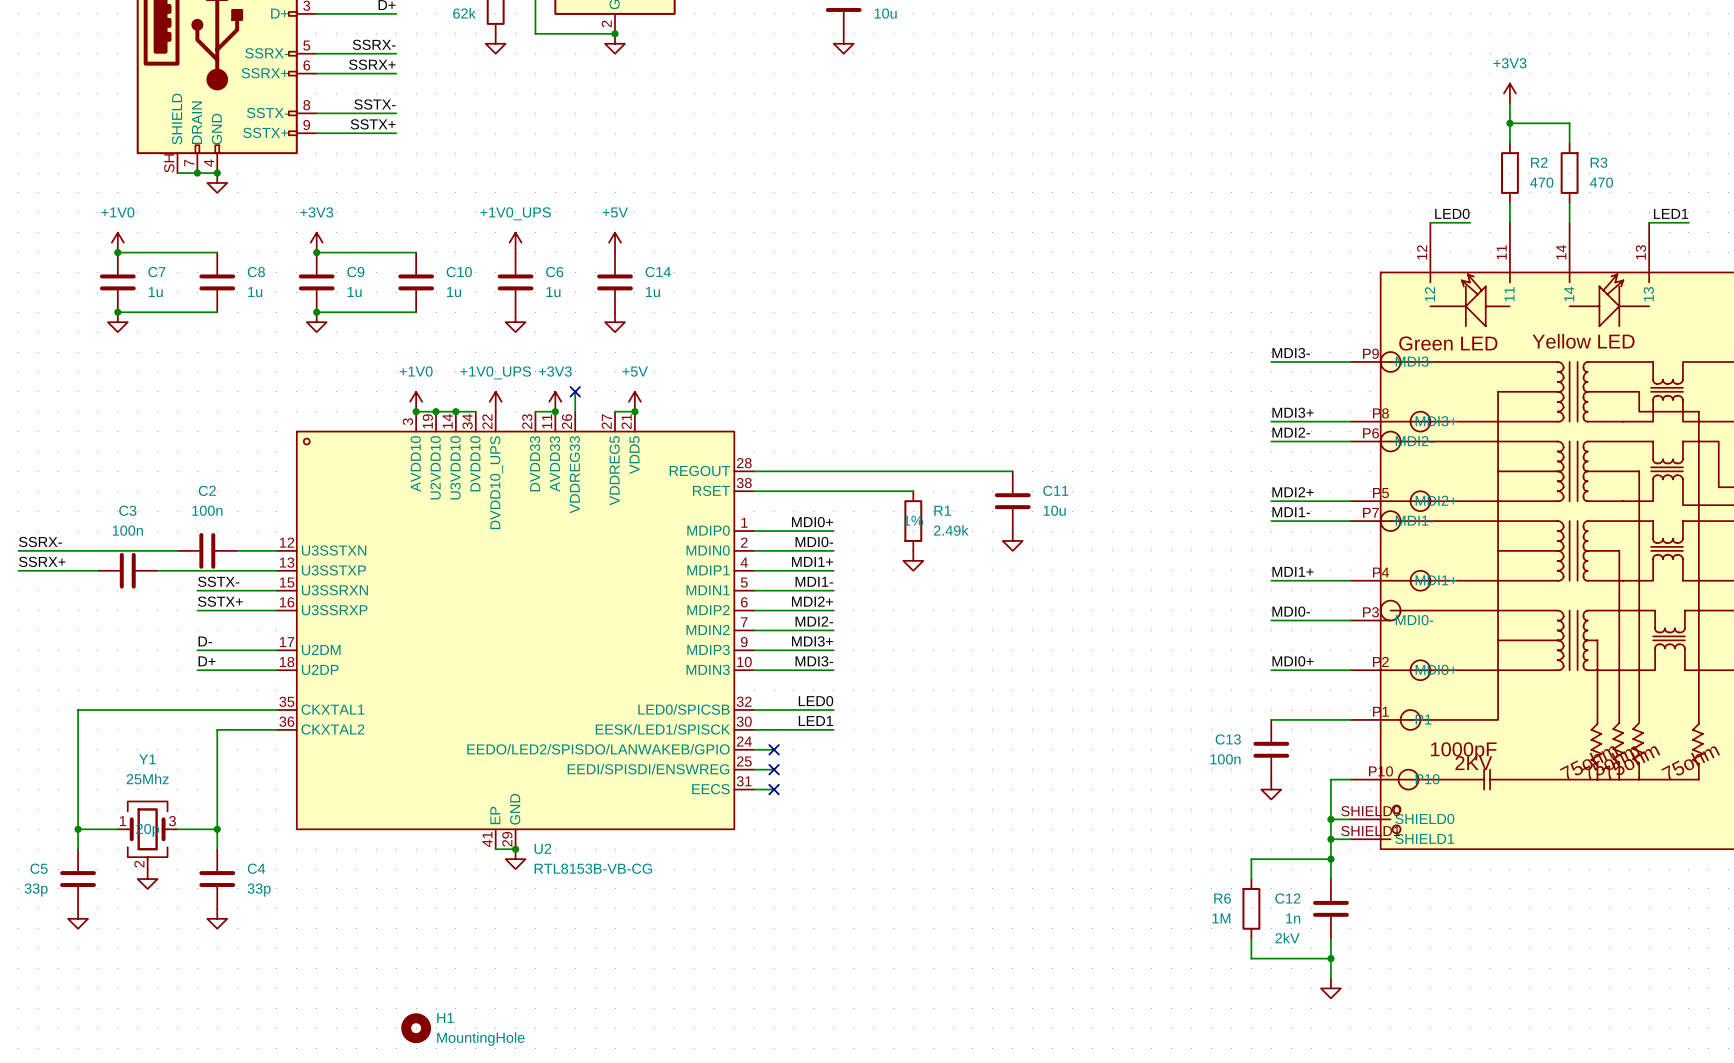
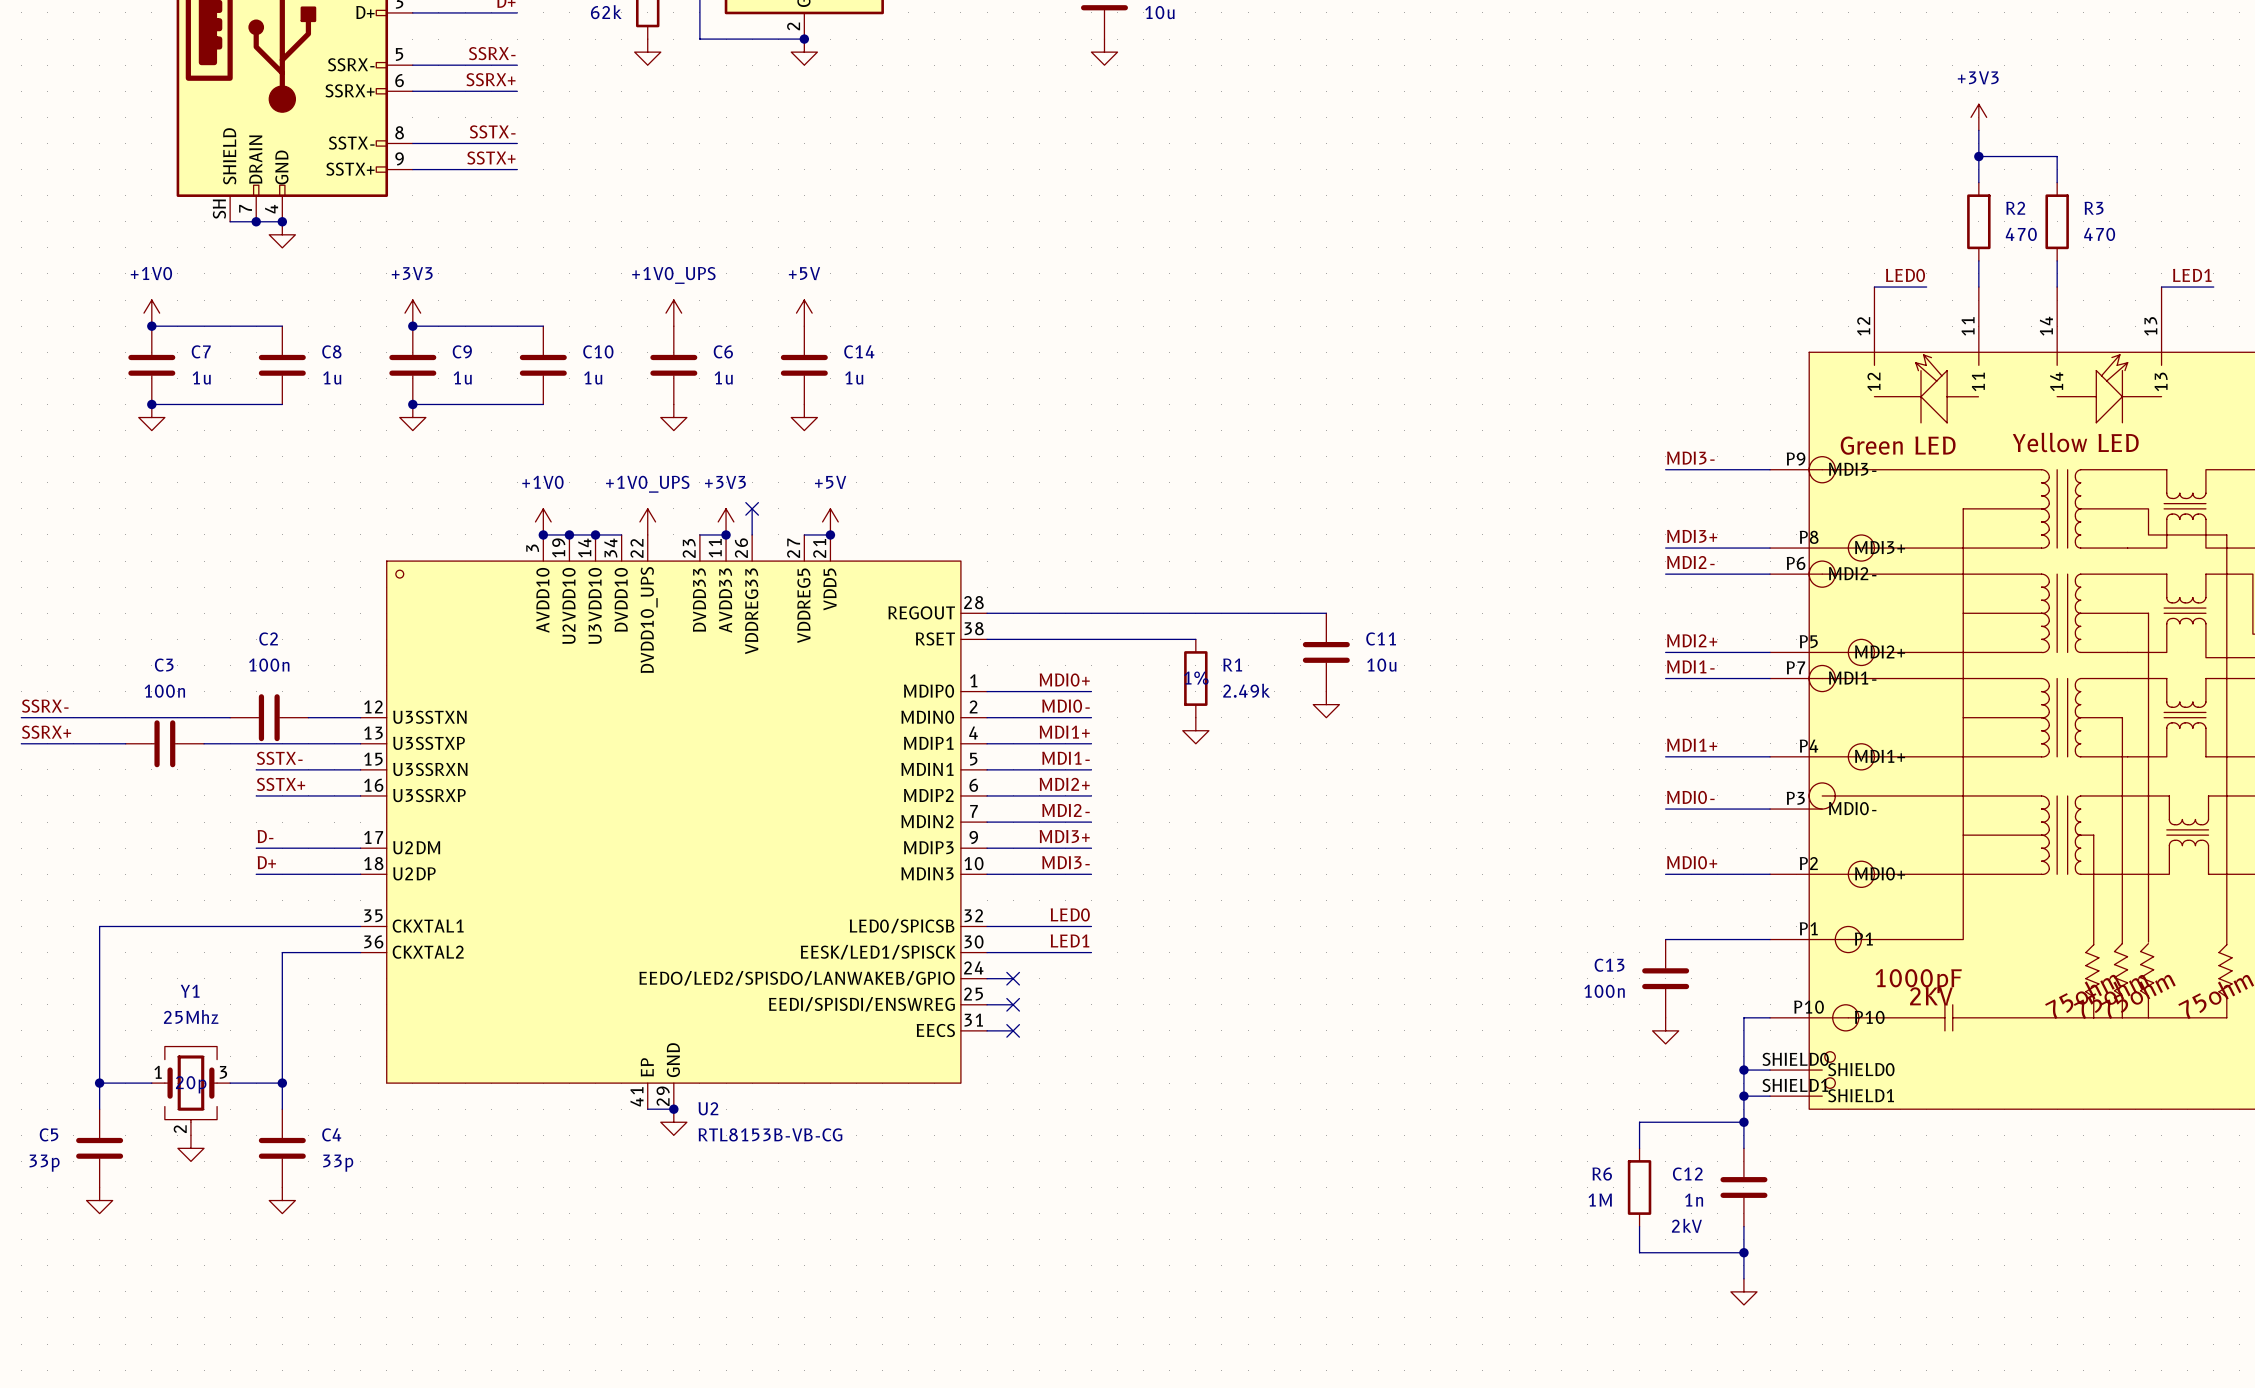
H1: MountingHole (416, 1028) -> none

